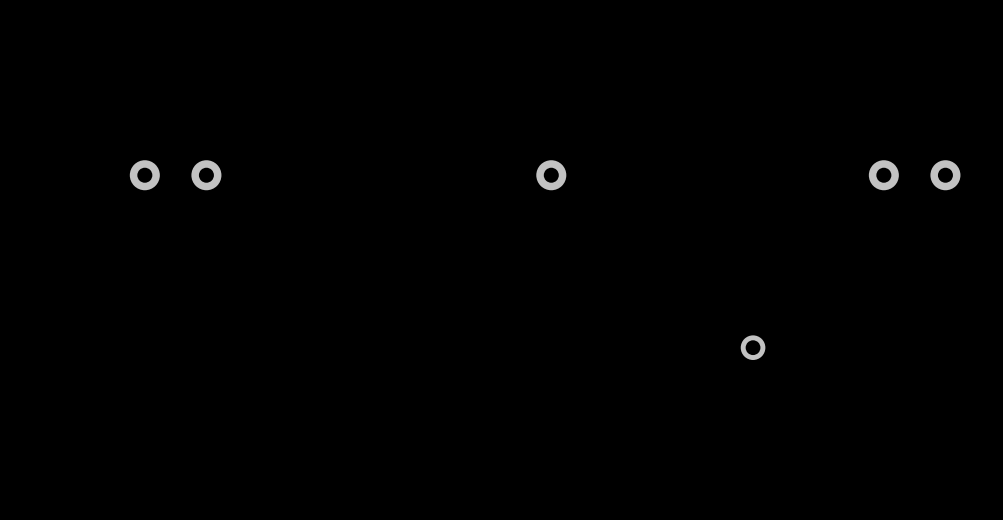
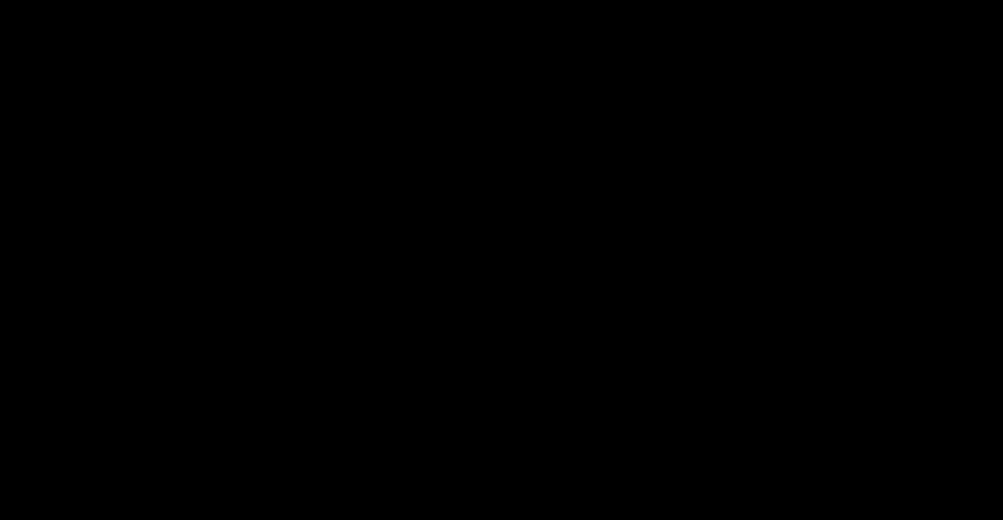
via: (144, 175) -> none
via: (206, 175) -> none
via: (551, 175) -> none
via: (883, 175) -> none
via: (945, 175) -> none
via: (753, 347) -> none

